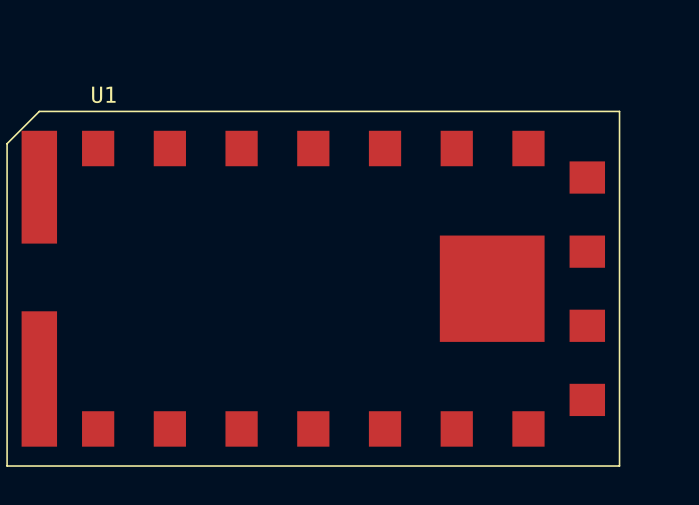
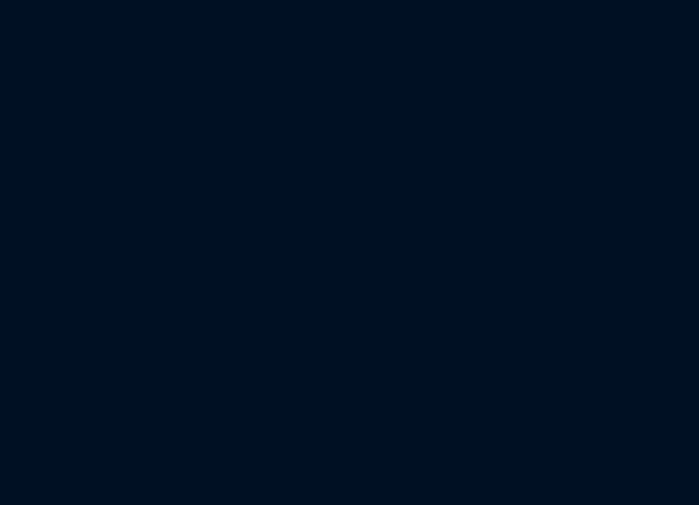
U1: (313, 288) -> none

